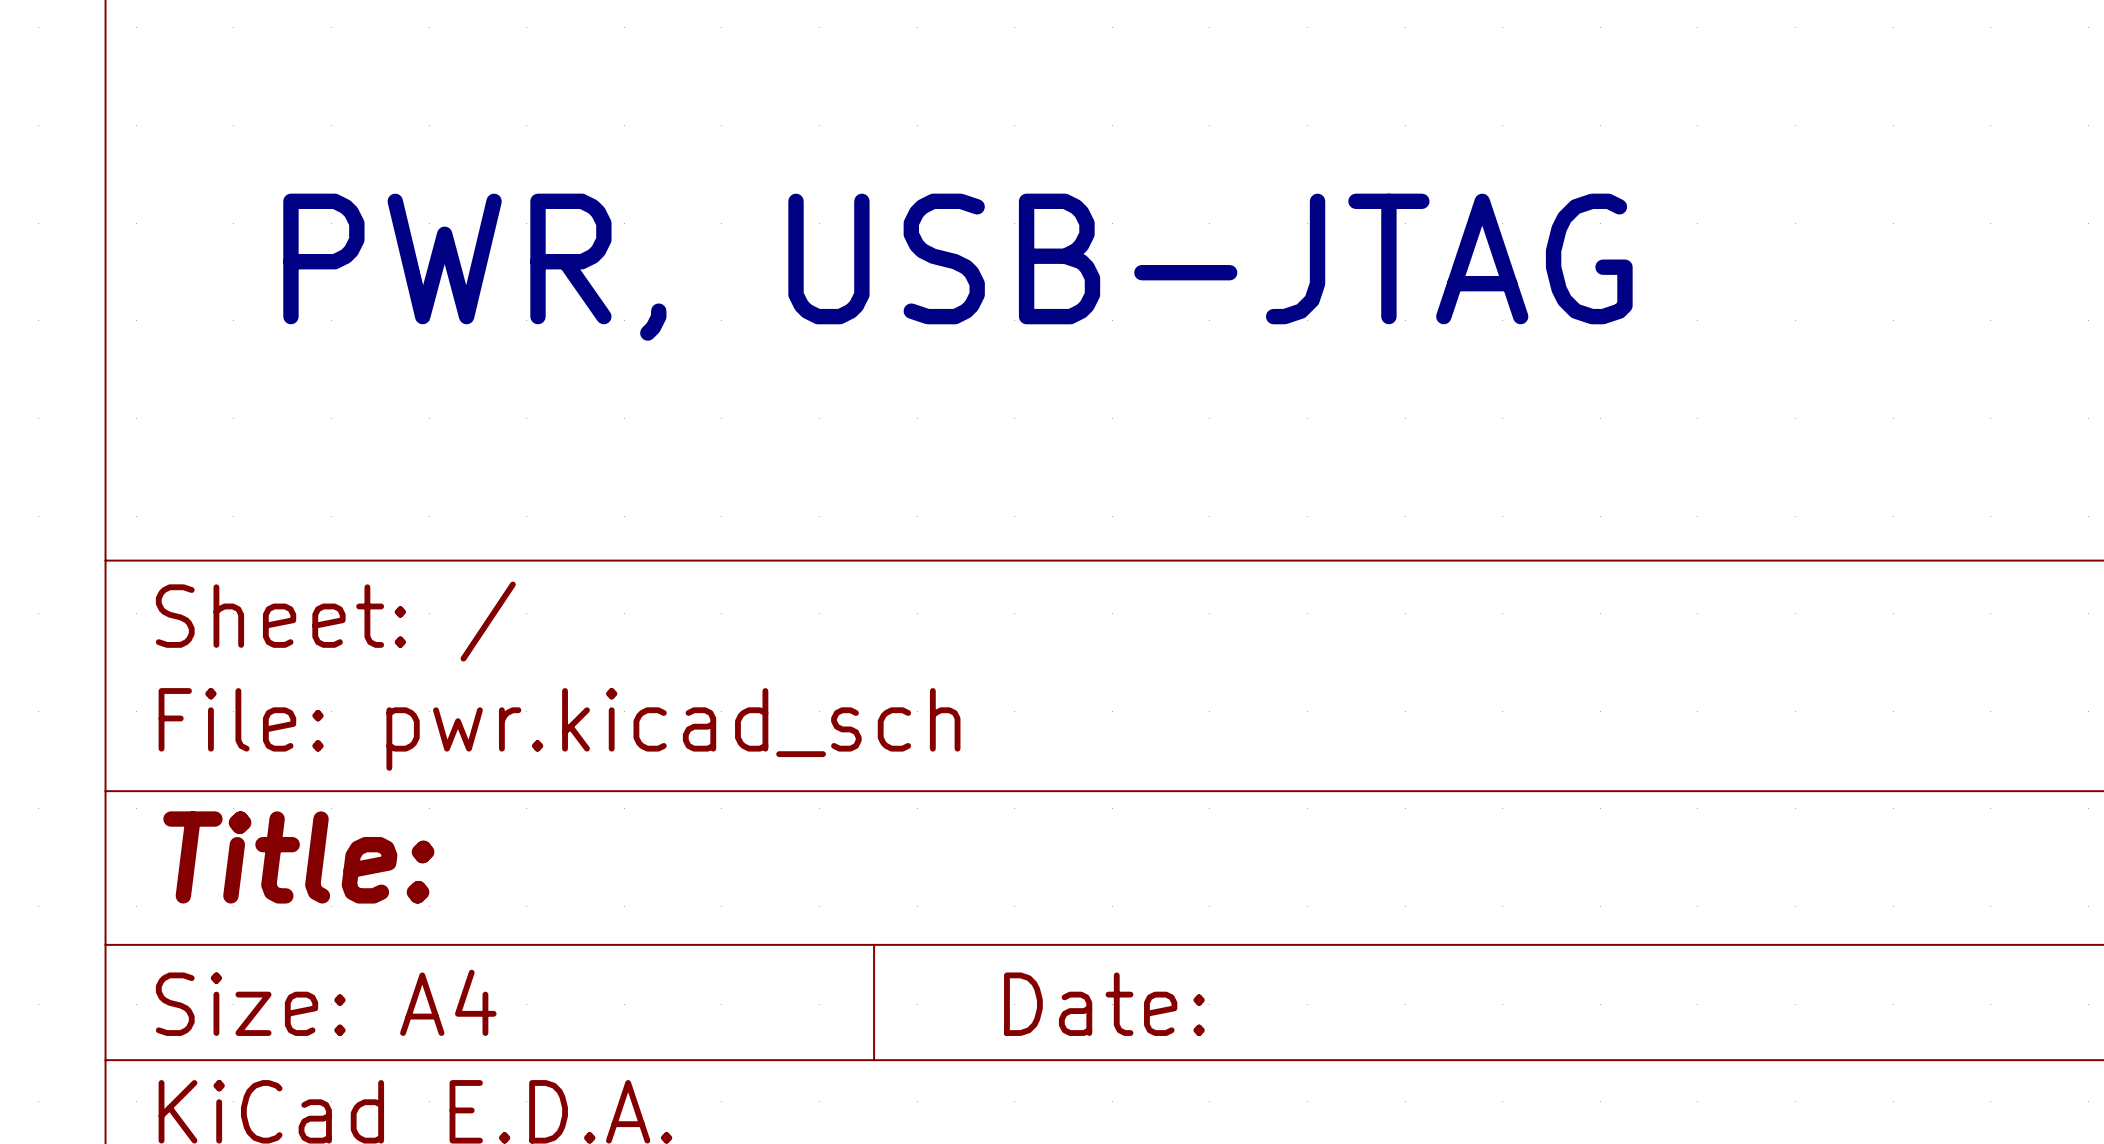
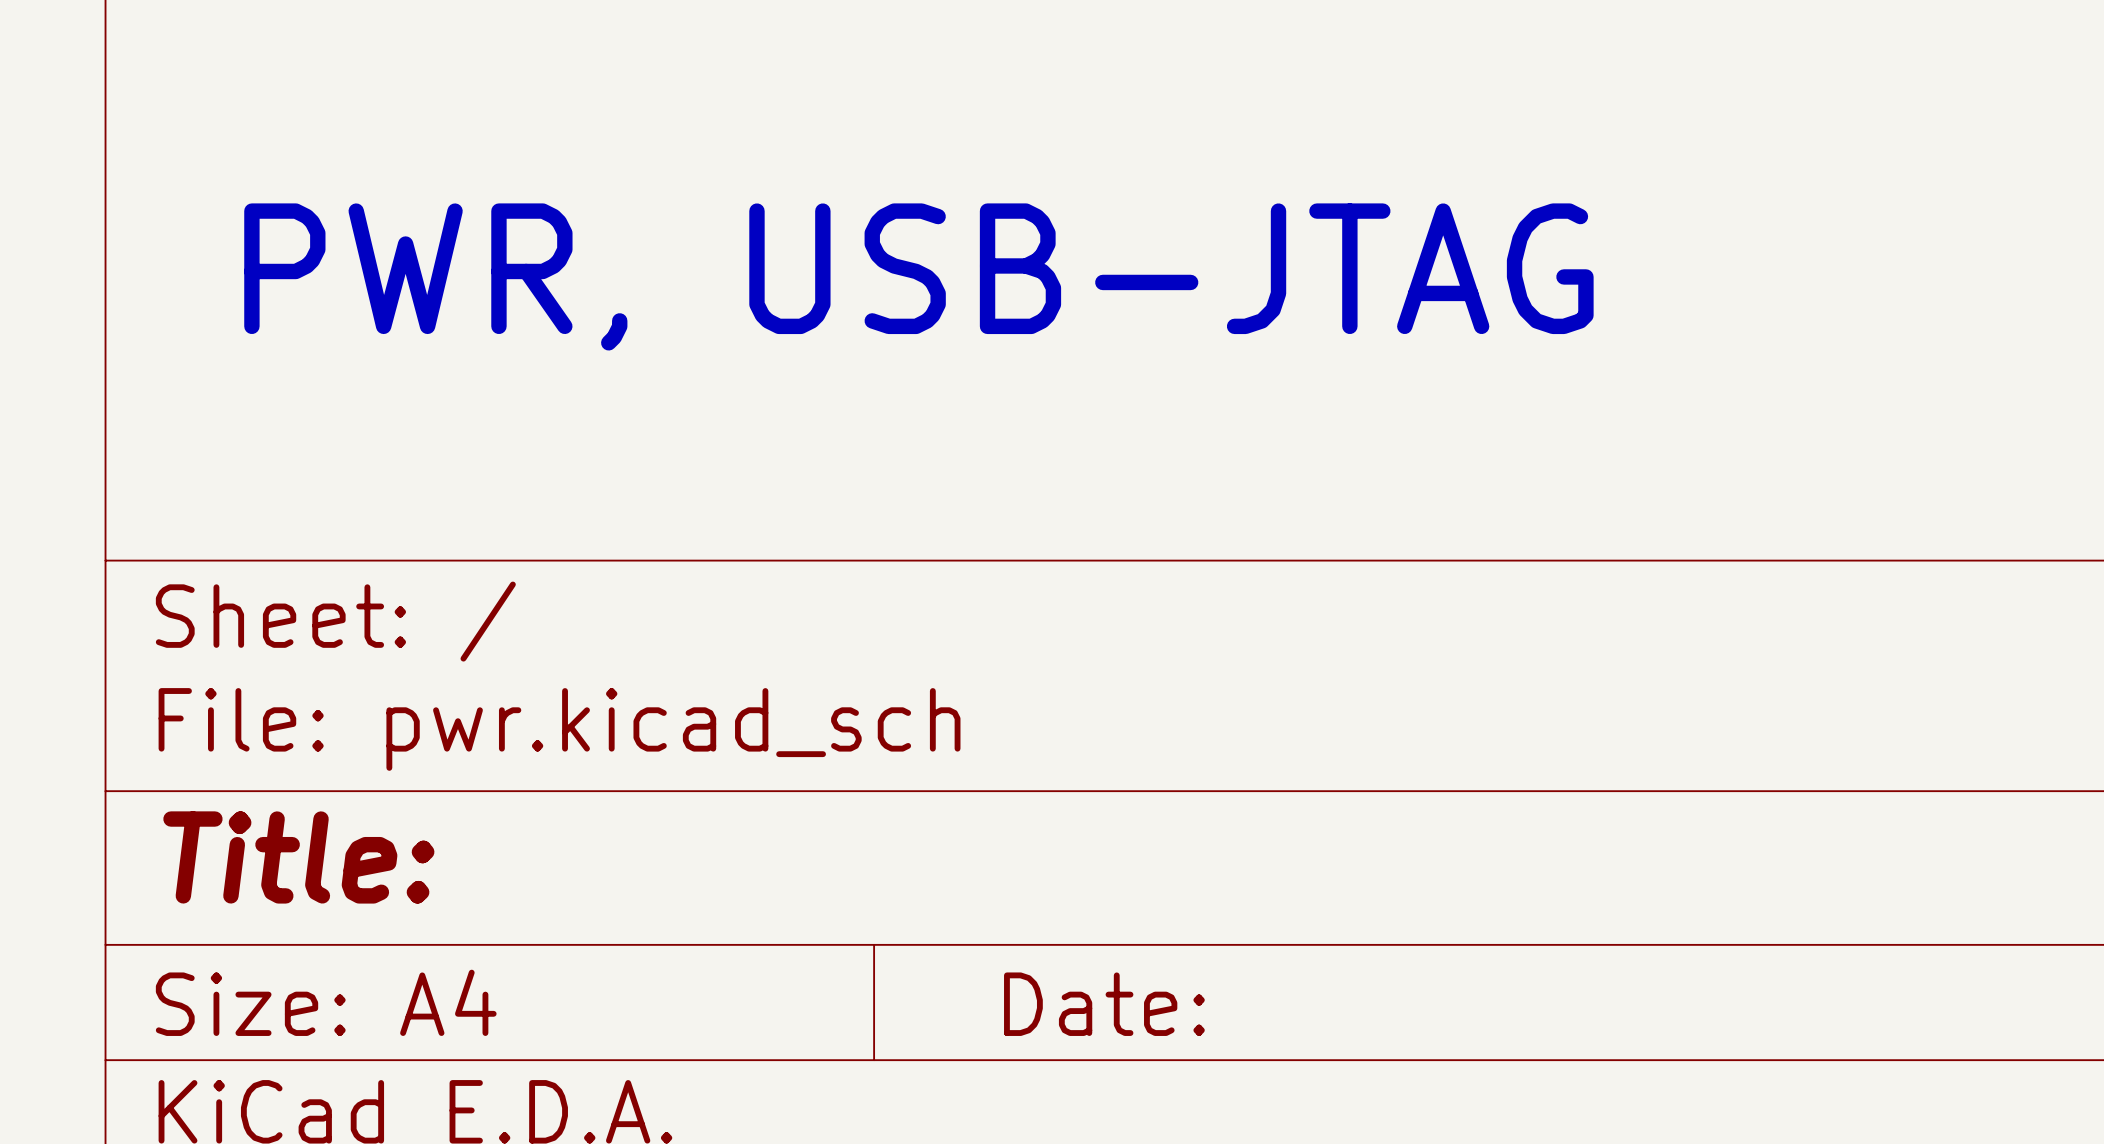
text position: PWR, USB-JTAG (957, 267) -> PWR, USB-JTAG (918, 276)

